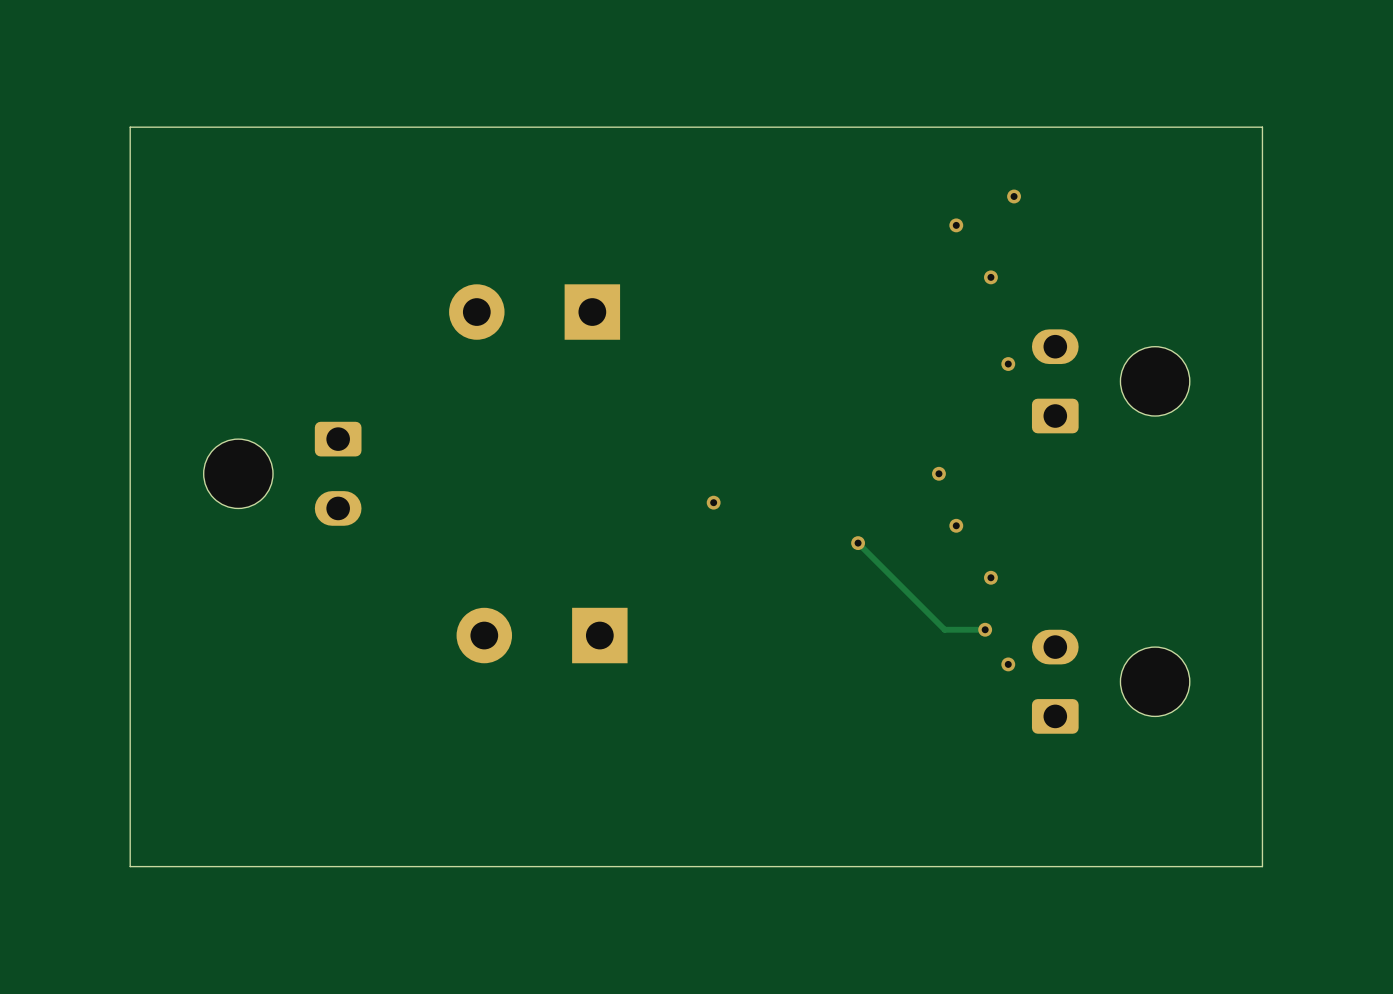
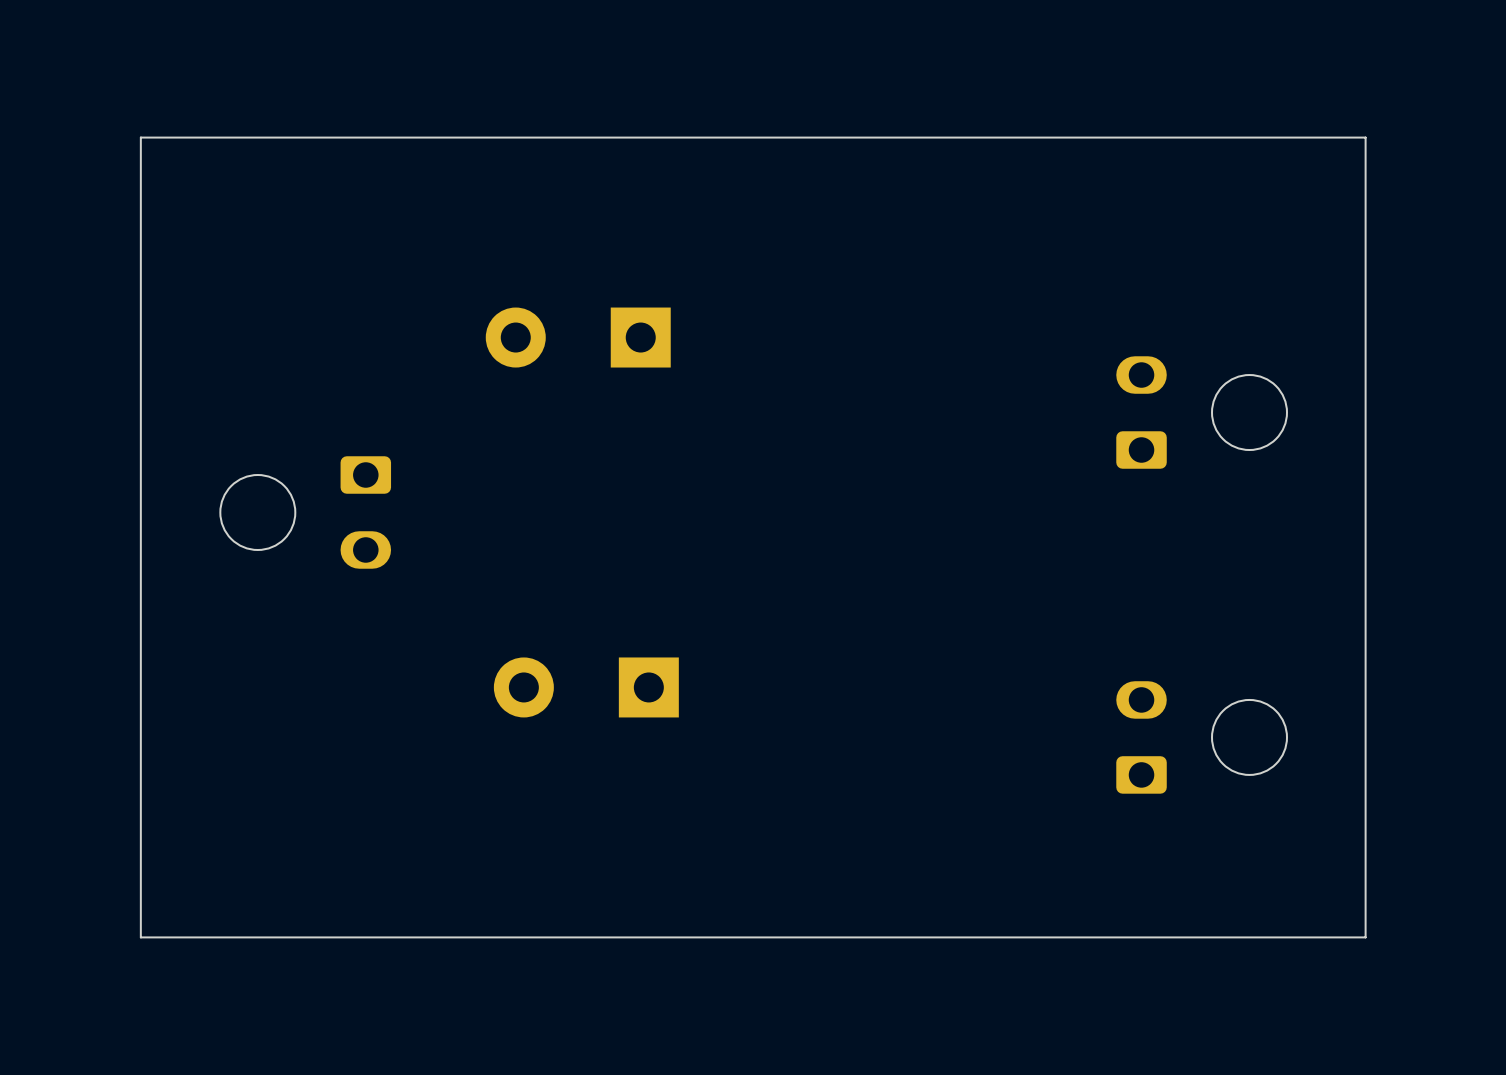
via: (1014, 196) -> none
via: (956, 225) -> none
via: (990, 277) -> none
via: (1008, 364) -> none
via: (938, 473) -> none
via: (713, 502) -> none
via: (956, 525) -> none
track: (858, 543) (944, 629) (985, 629) -> none
via: (858, 543) -> none
via: (990, 577) -> none
via: (985, 629) -> none
via: (1008, 664) -> none

